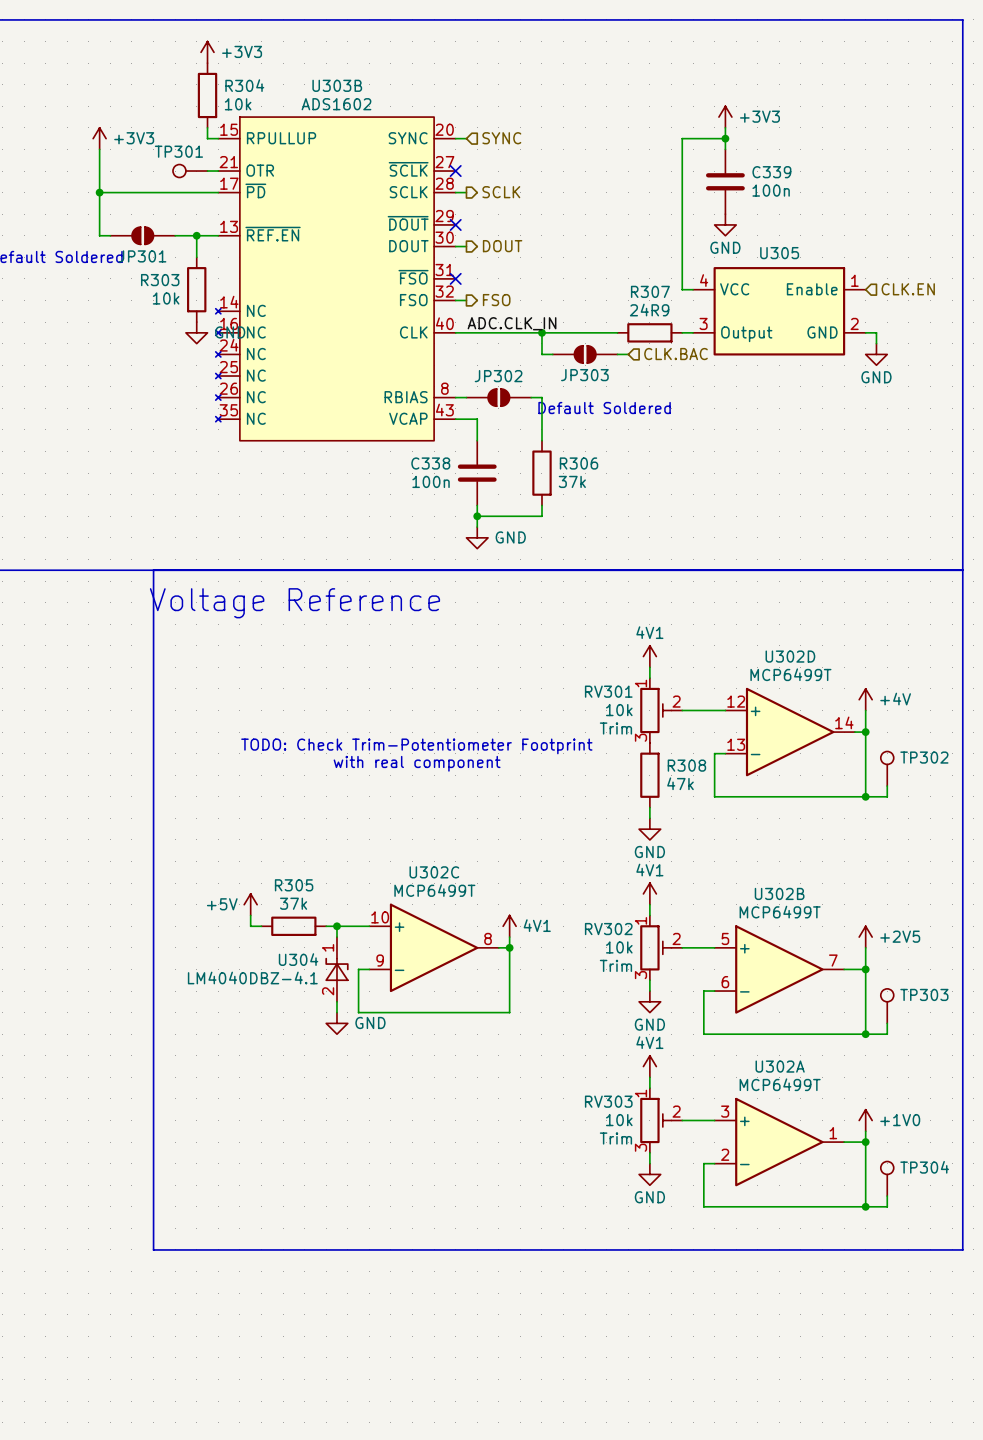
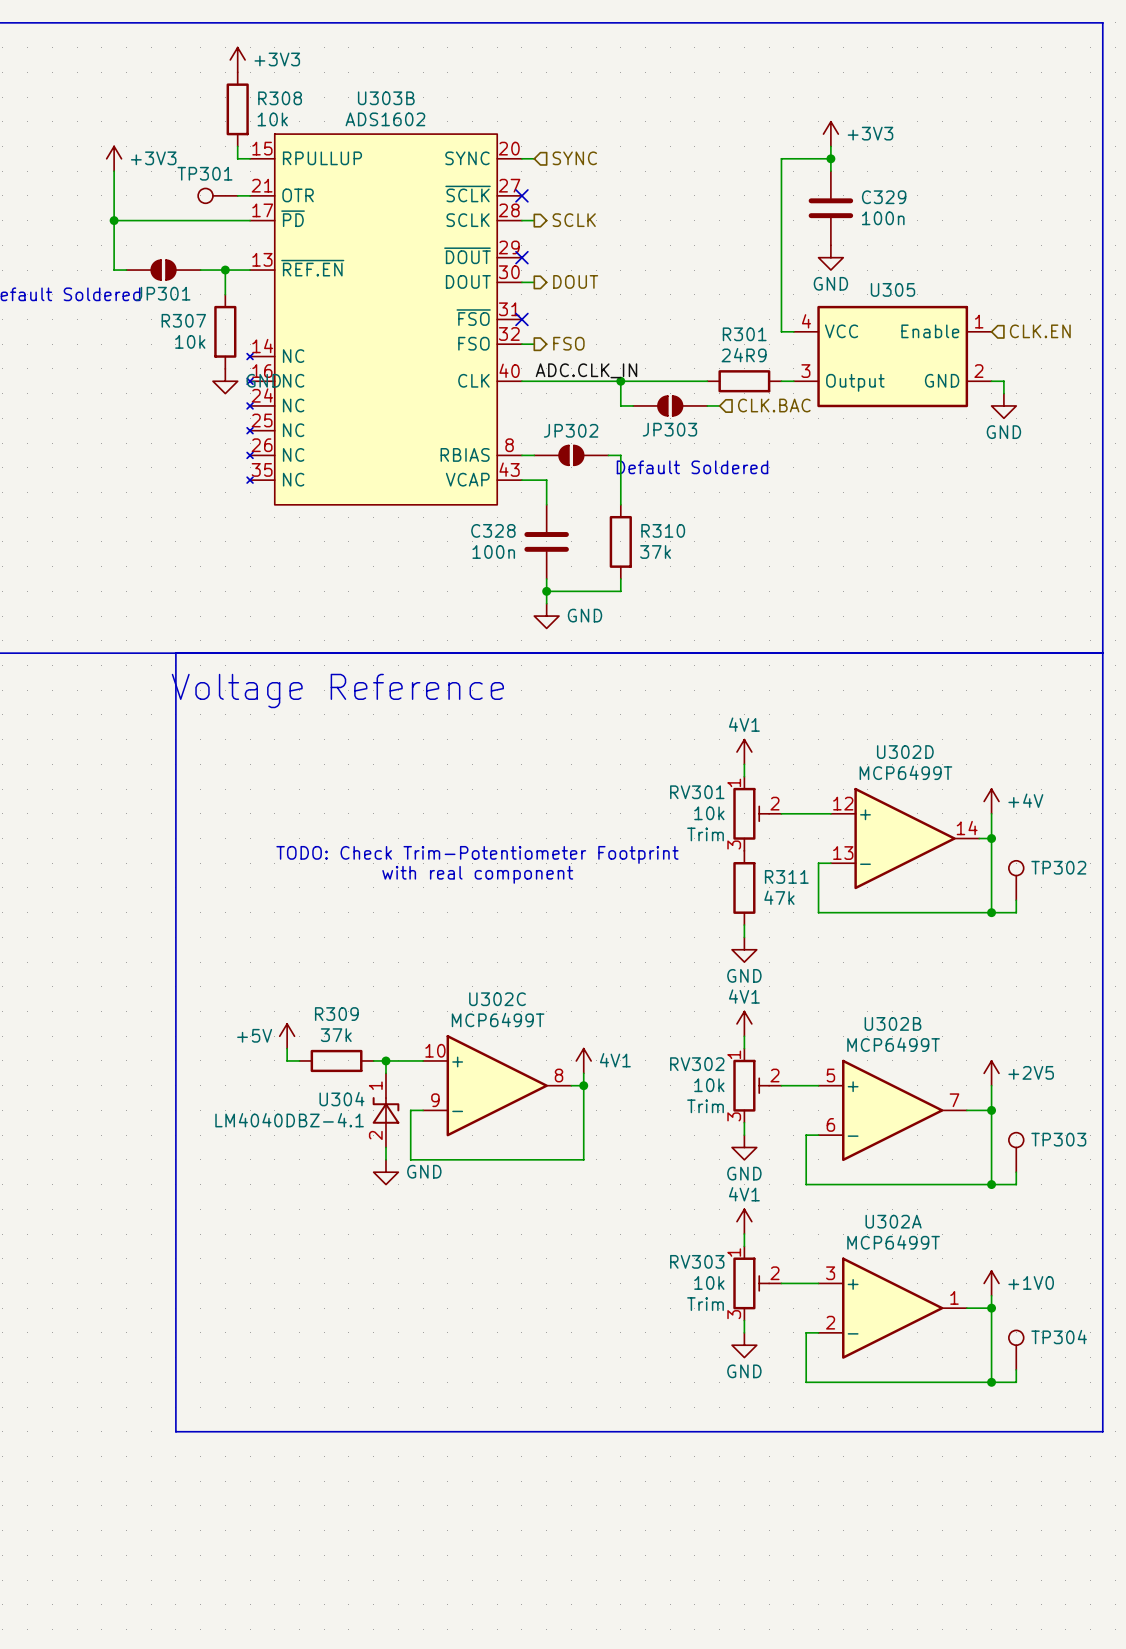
R304 name: R304 (244, 85) -> R308 (280, 98)
C339 name: C339 (771, 172) -> C329 (884, 197)
R303 name: R303 (160, 280) -> R307 (183, 320)
R307 name: R307 (650, 291) -> R301 (744, 334)
C338 name: C338 (430, 463) -> C328 (493, 530)
R306 name: R306 (579, 463) -> R310 (663, 530)
R308 name: R308 (686, 765) -> R311 (786, 876)
R305 name: R305 (294, 885) -> R309 (336, 1014)

